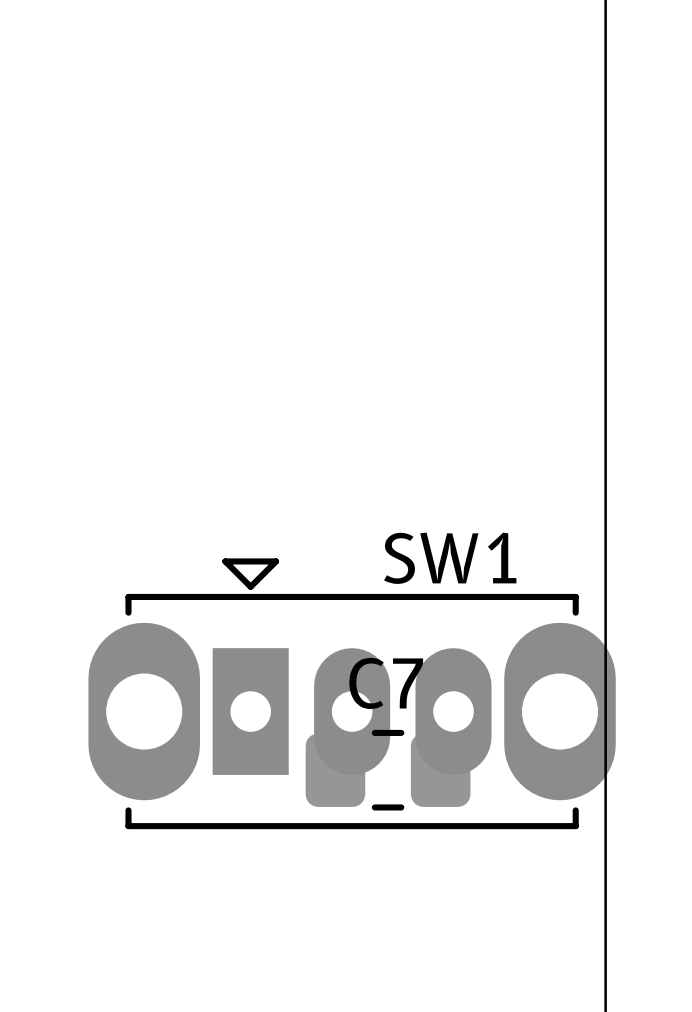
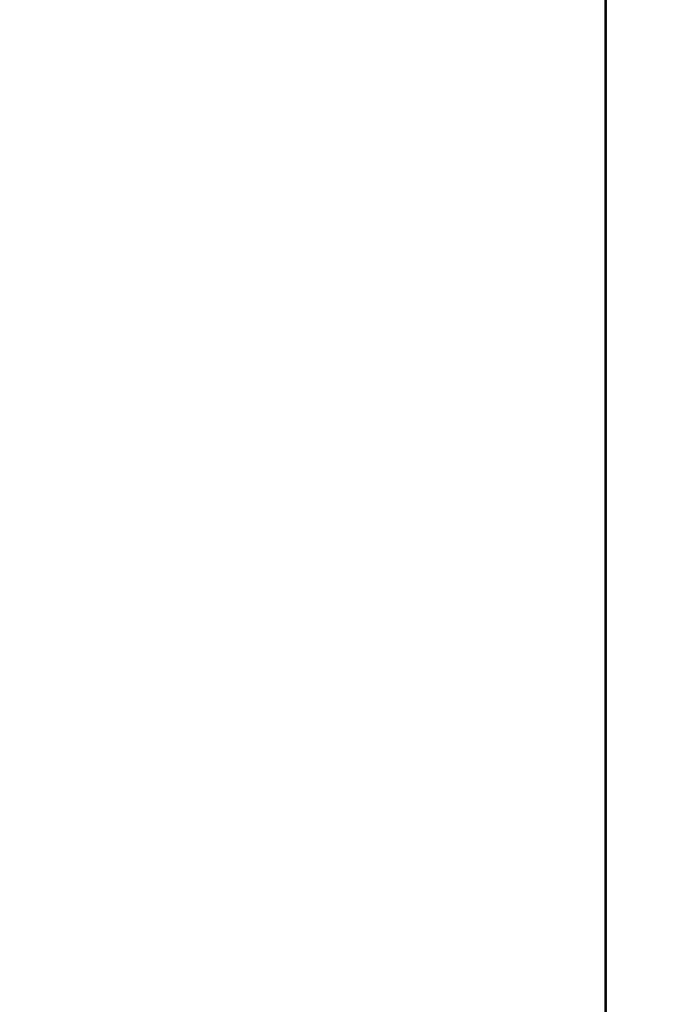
SW1: (352, 693) -> none
C7: (388, 770) -> none

